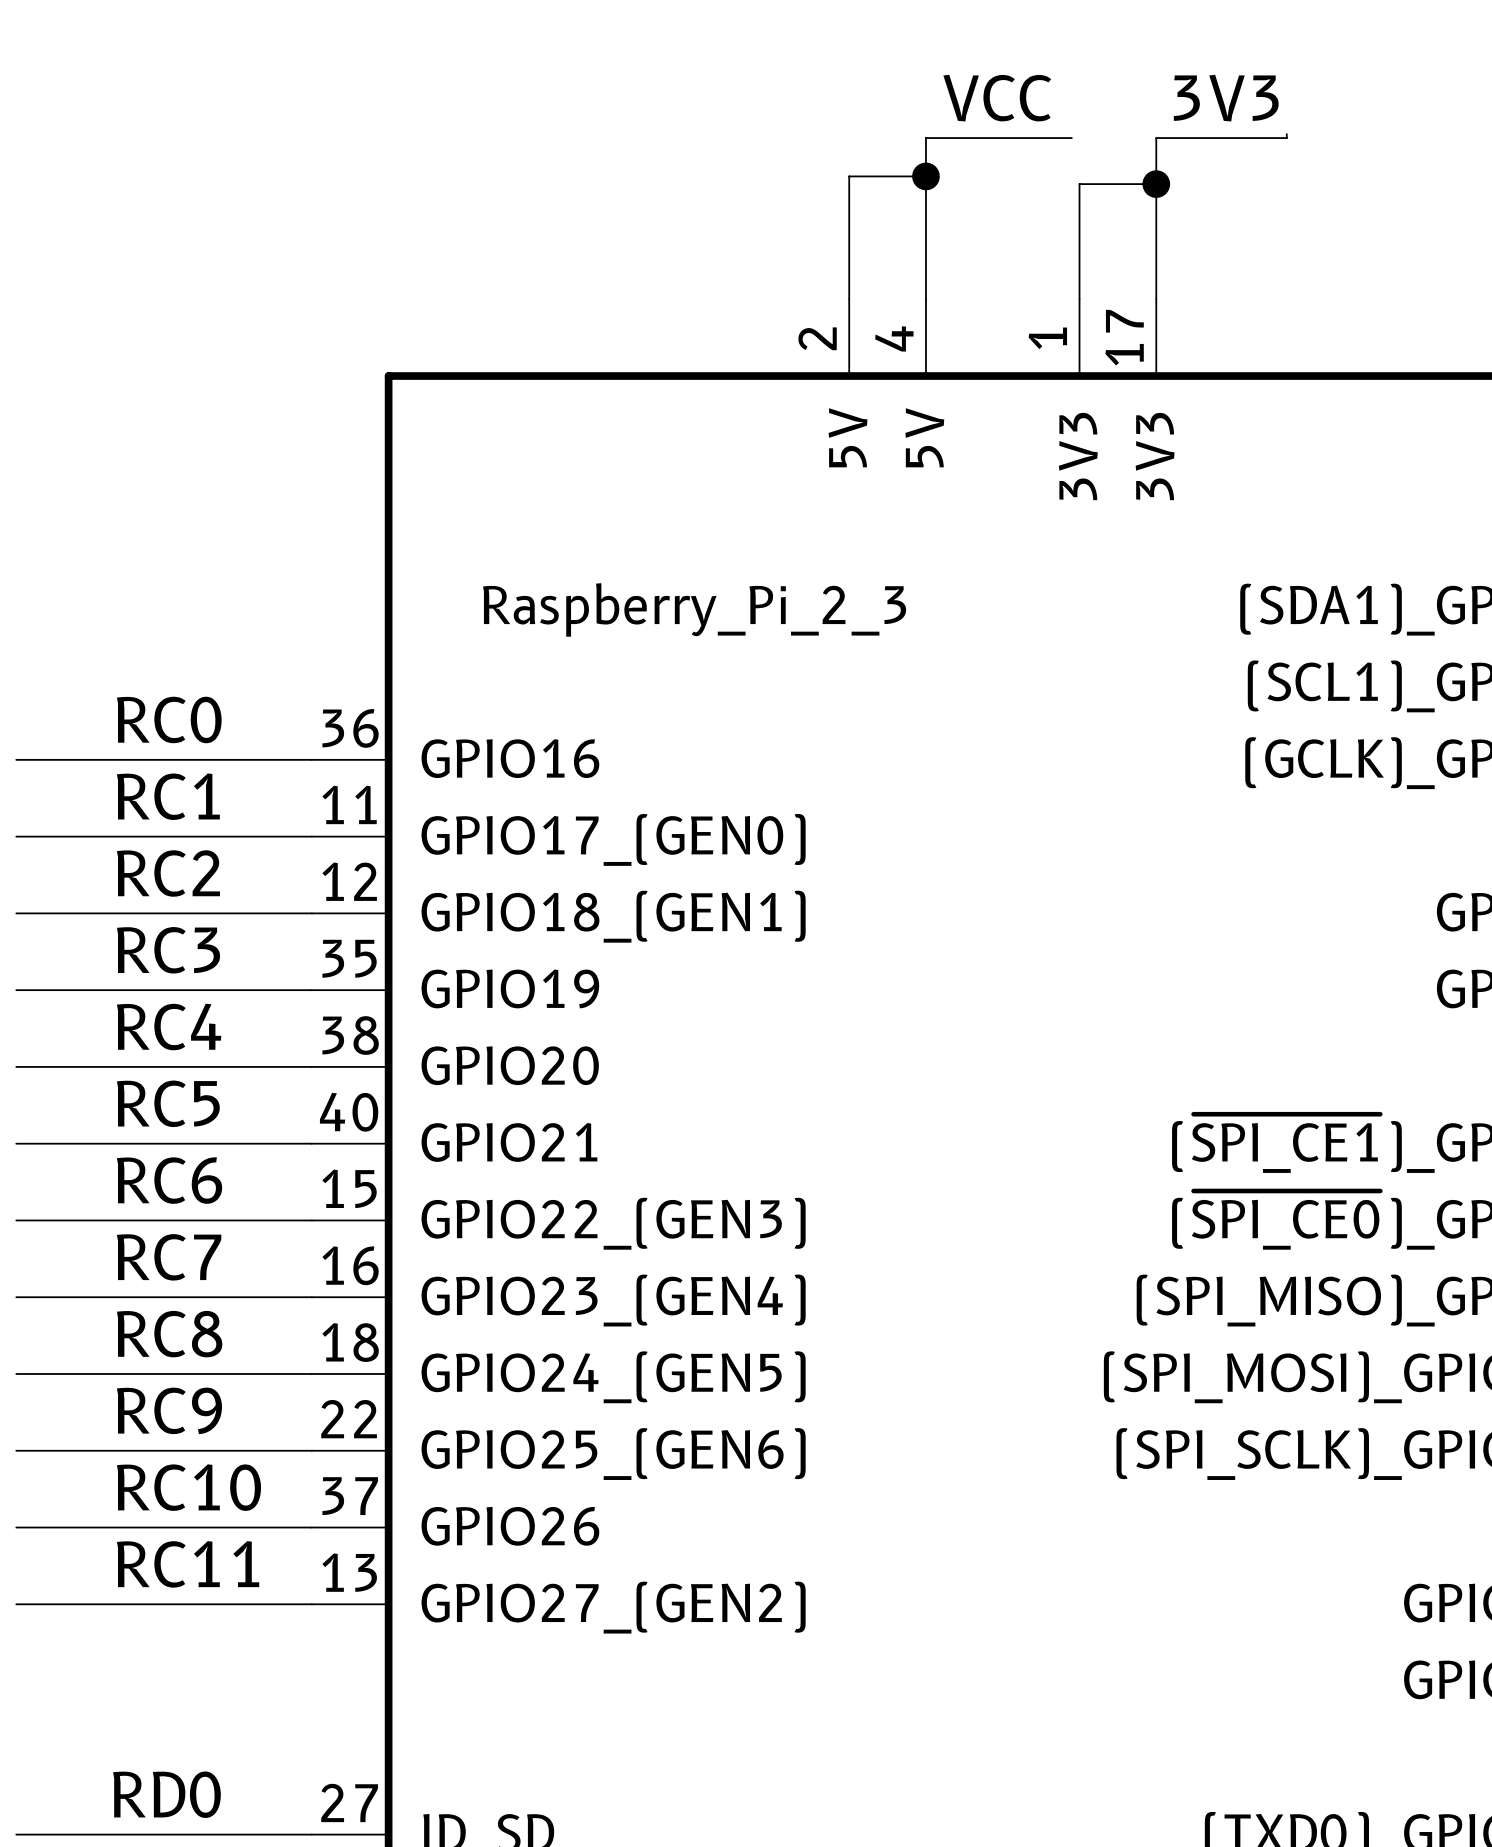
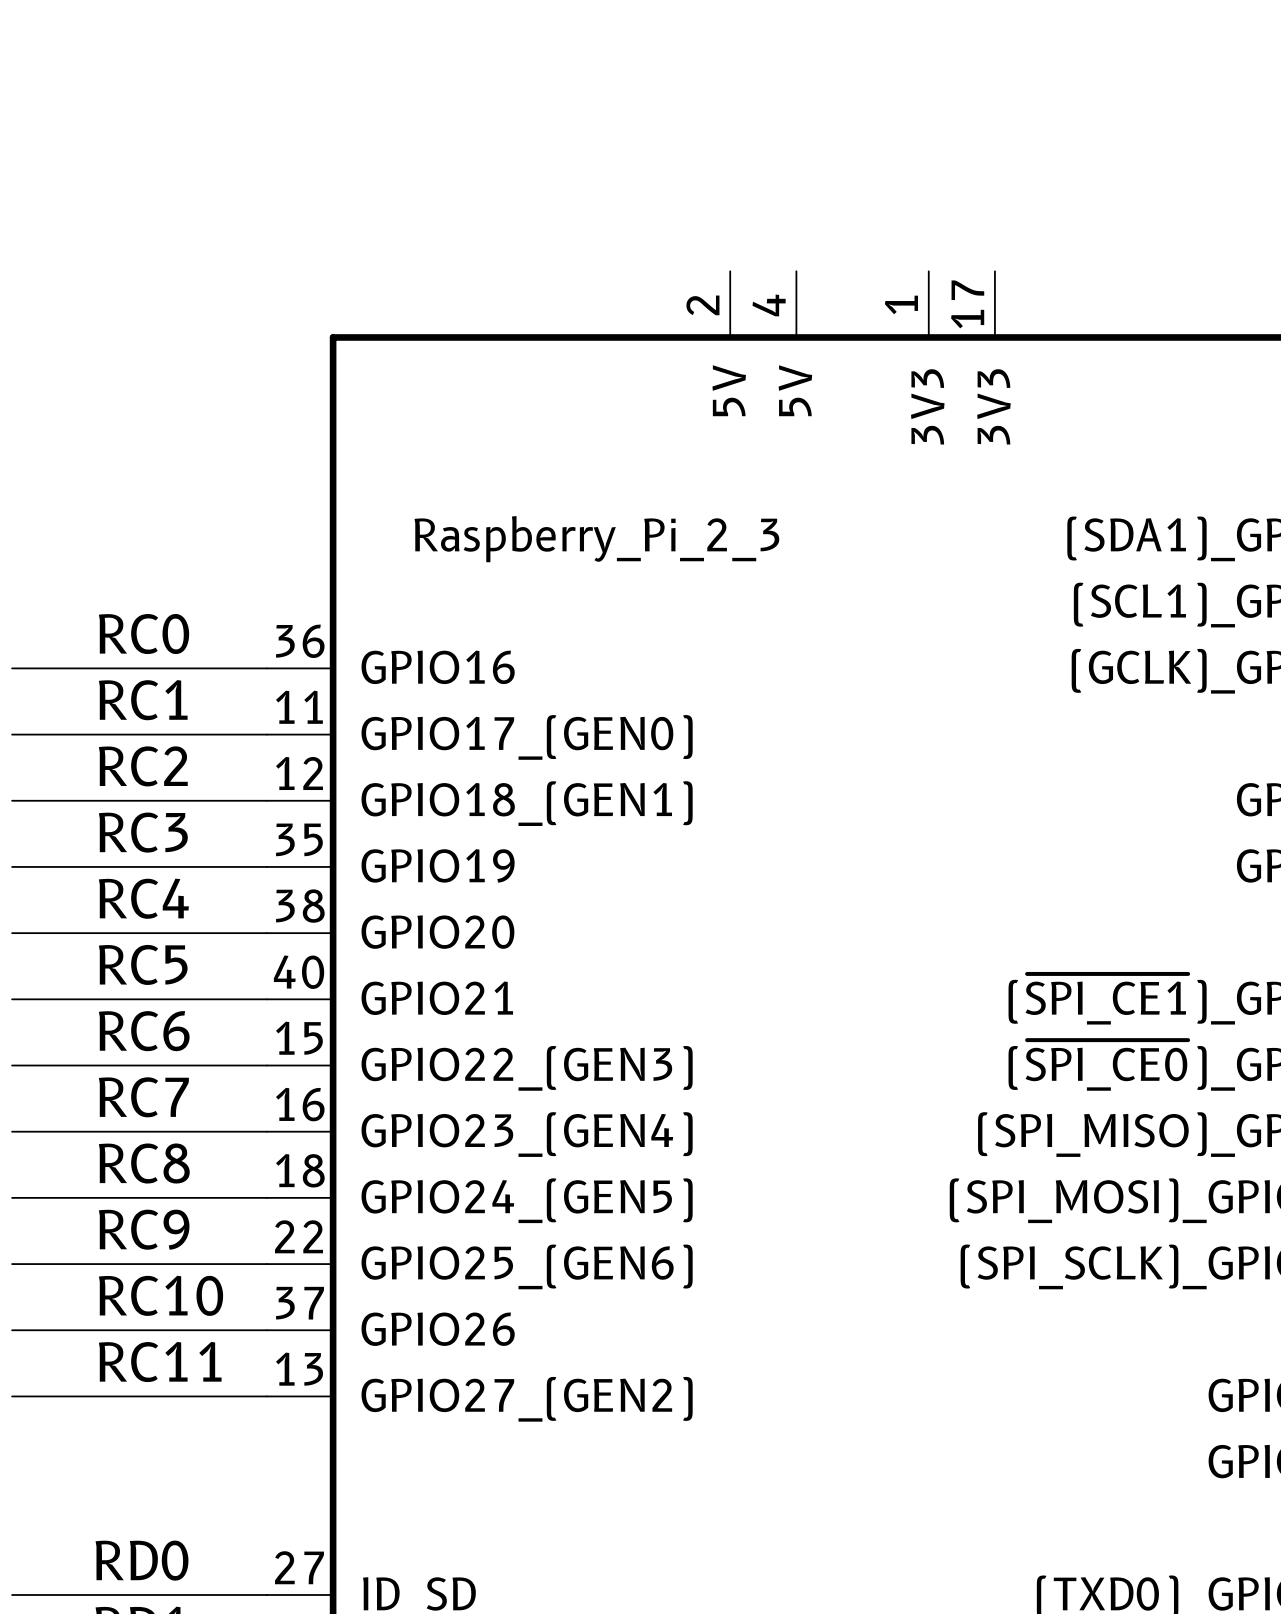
label: VCC (997, 98) -> none
label: 3V3 (1226, 98) -> none
wire: (1286, 134) (1286, 138) (1156, 138) (1156, 299) -> none
wire: (1071, 138) (925, 138) (925, 299) -> none
wire: (925, 176) (849, 176) (849, 299) -> none
junction: (925, 176) -> none
wire: (1156, 184) (1079, 184) (1079, 299) -> none
junction: (1156, 184) -> none

